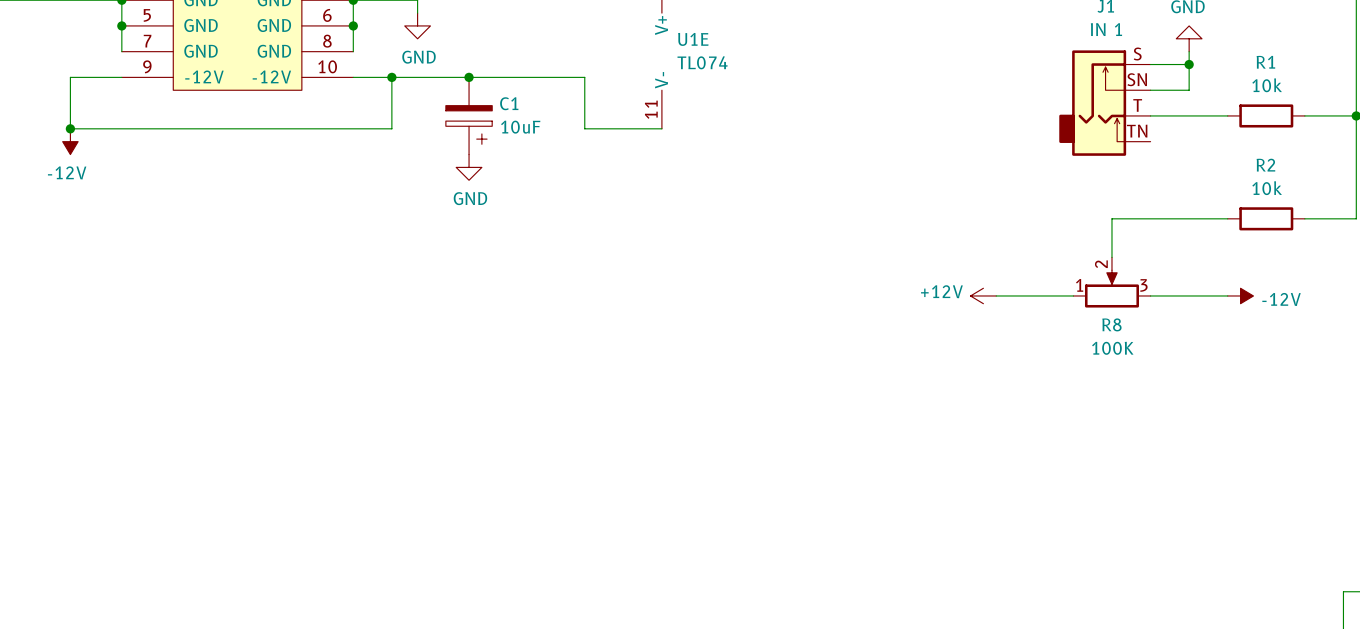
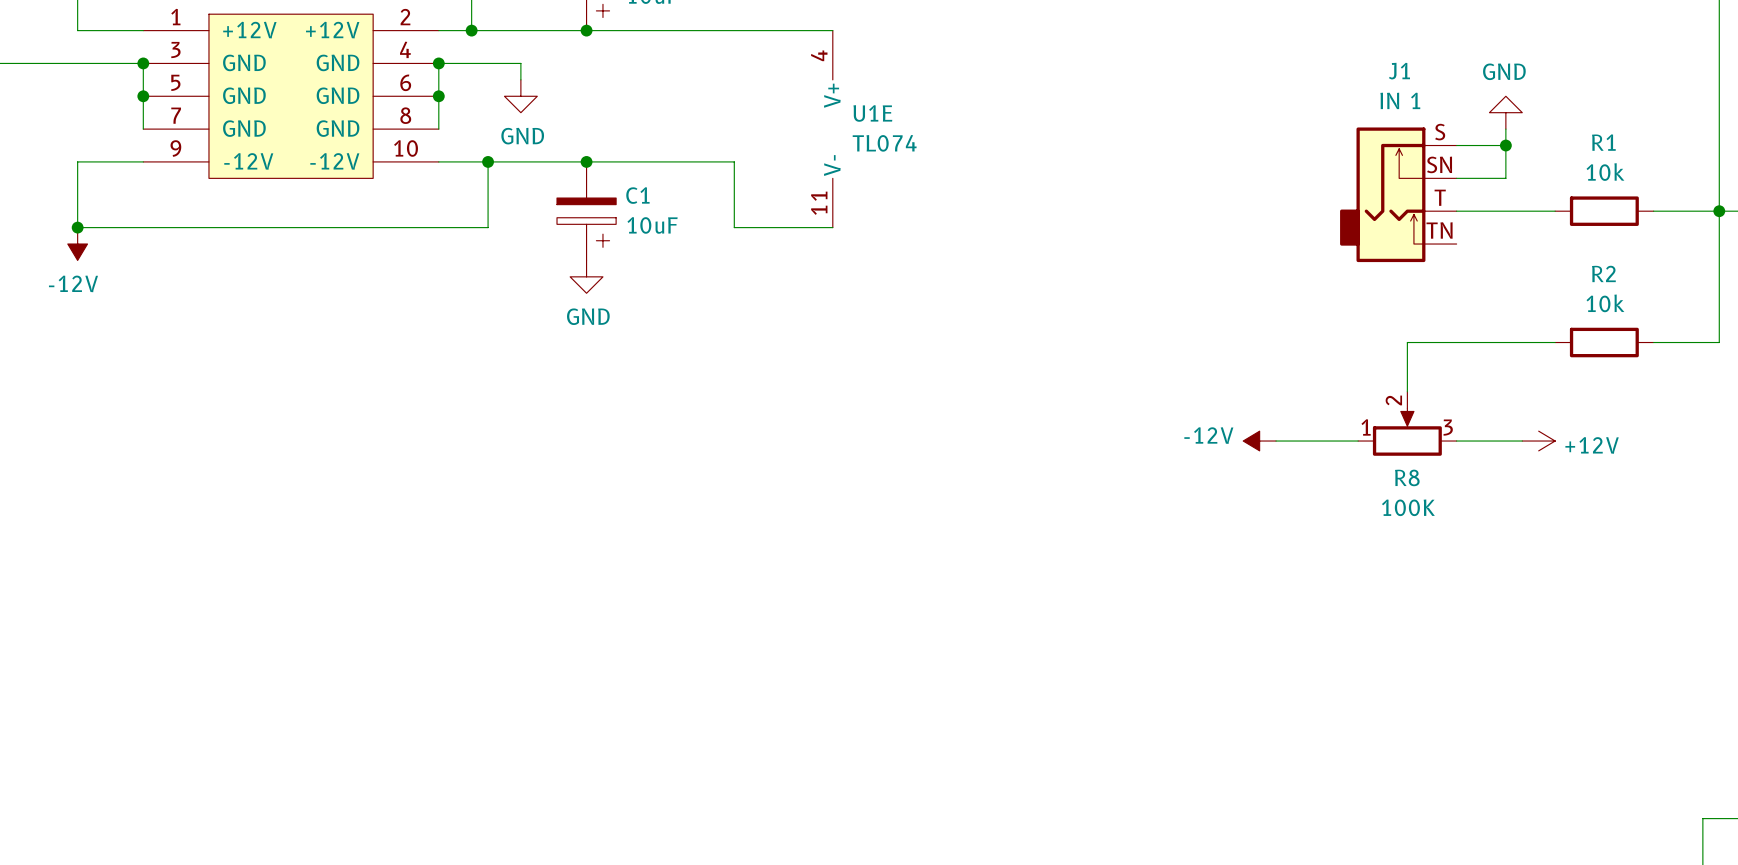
power symbol rotation: 0° (983, 295) -> 180° (1538, 441)
power symbol position: +12V (983, 295) -> +12V (1538, 441)
power symbol rotation: 0° (1240, 295) -> 180° (1259, 441)
power symbol position: -12V (1240, 295) -> -12V (1259, 441)

